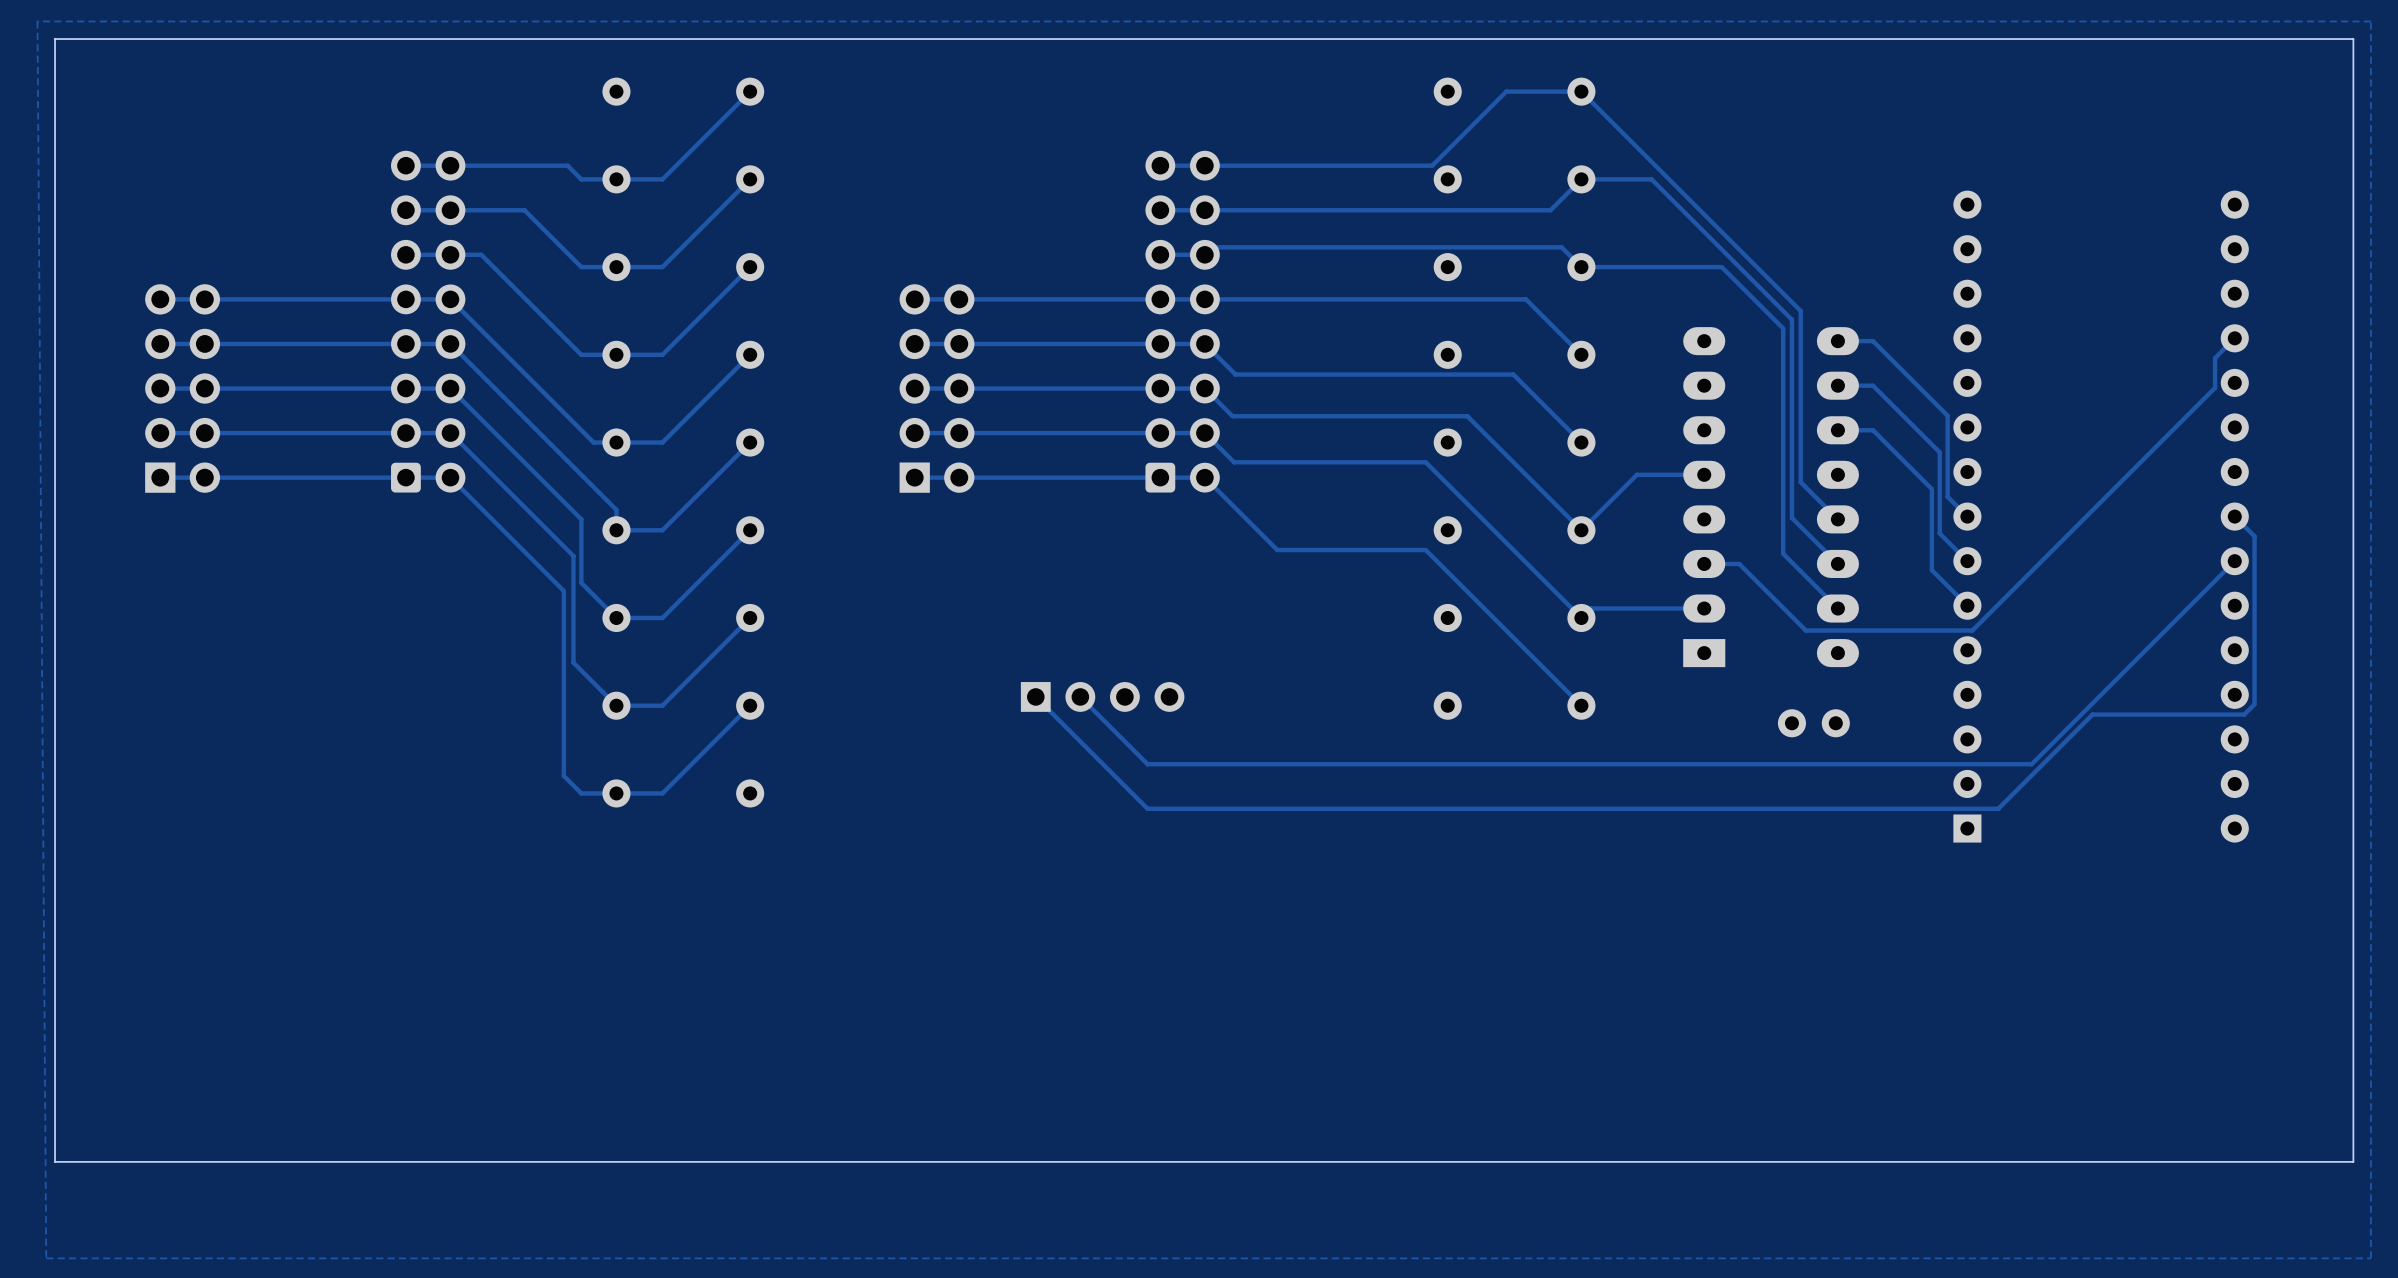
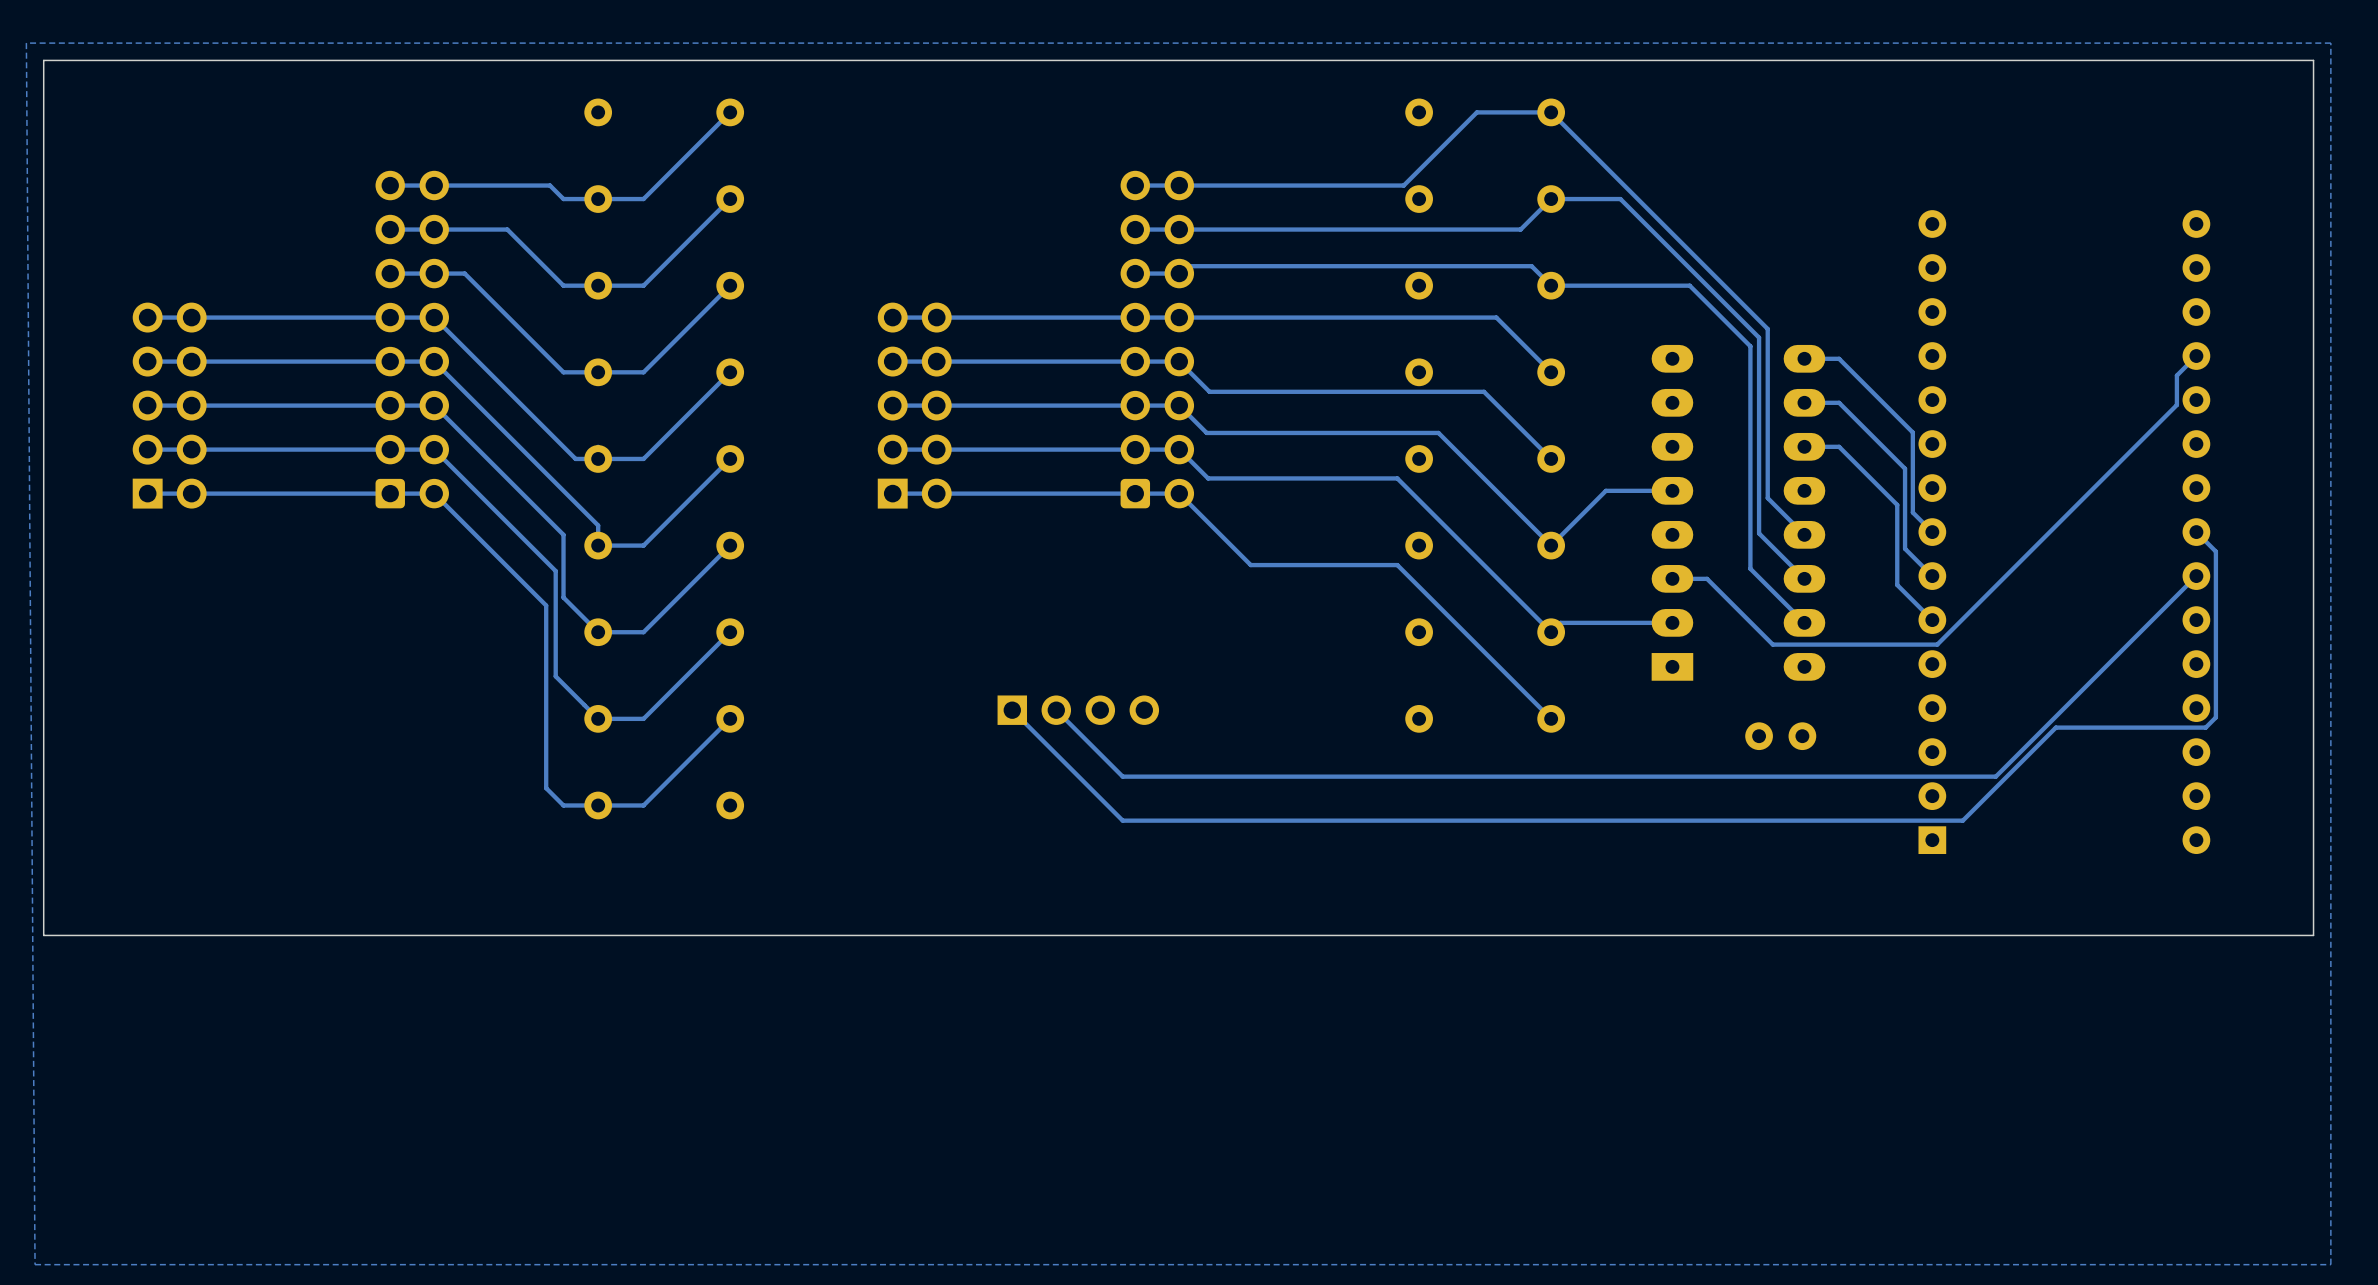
board edge: (2353, 925) (2353, 1161) (55, 1161) (55, 925) -> (2313, 935) (43, 935)

